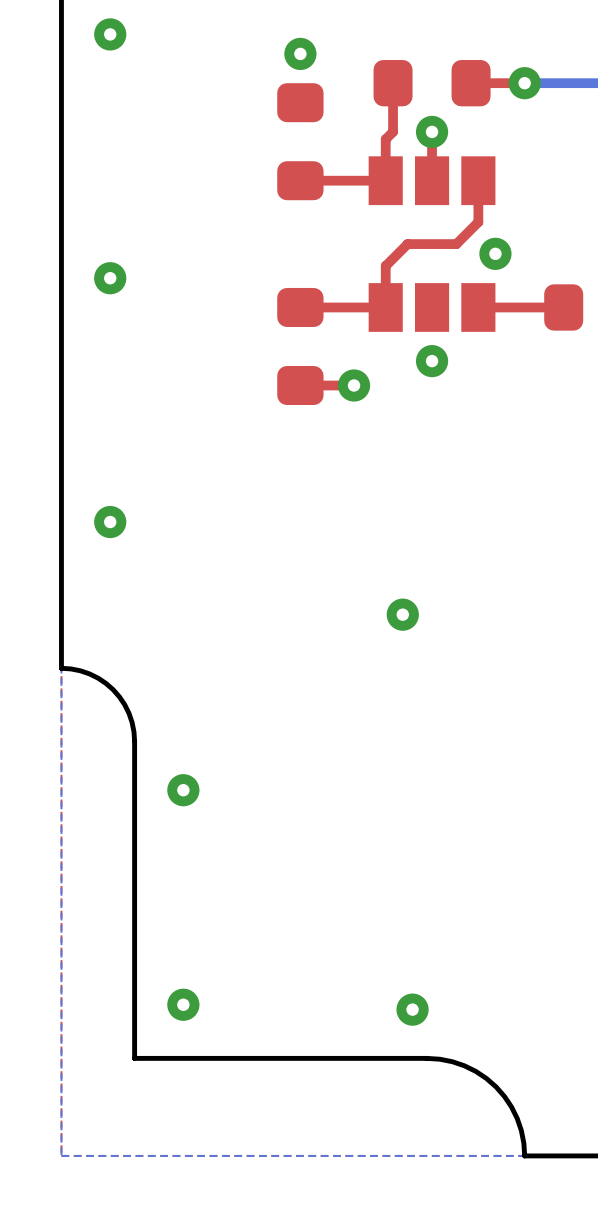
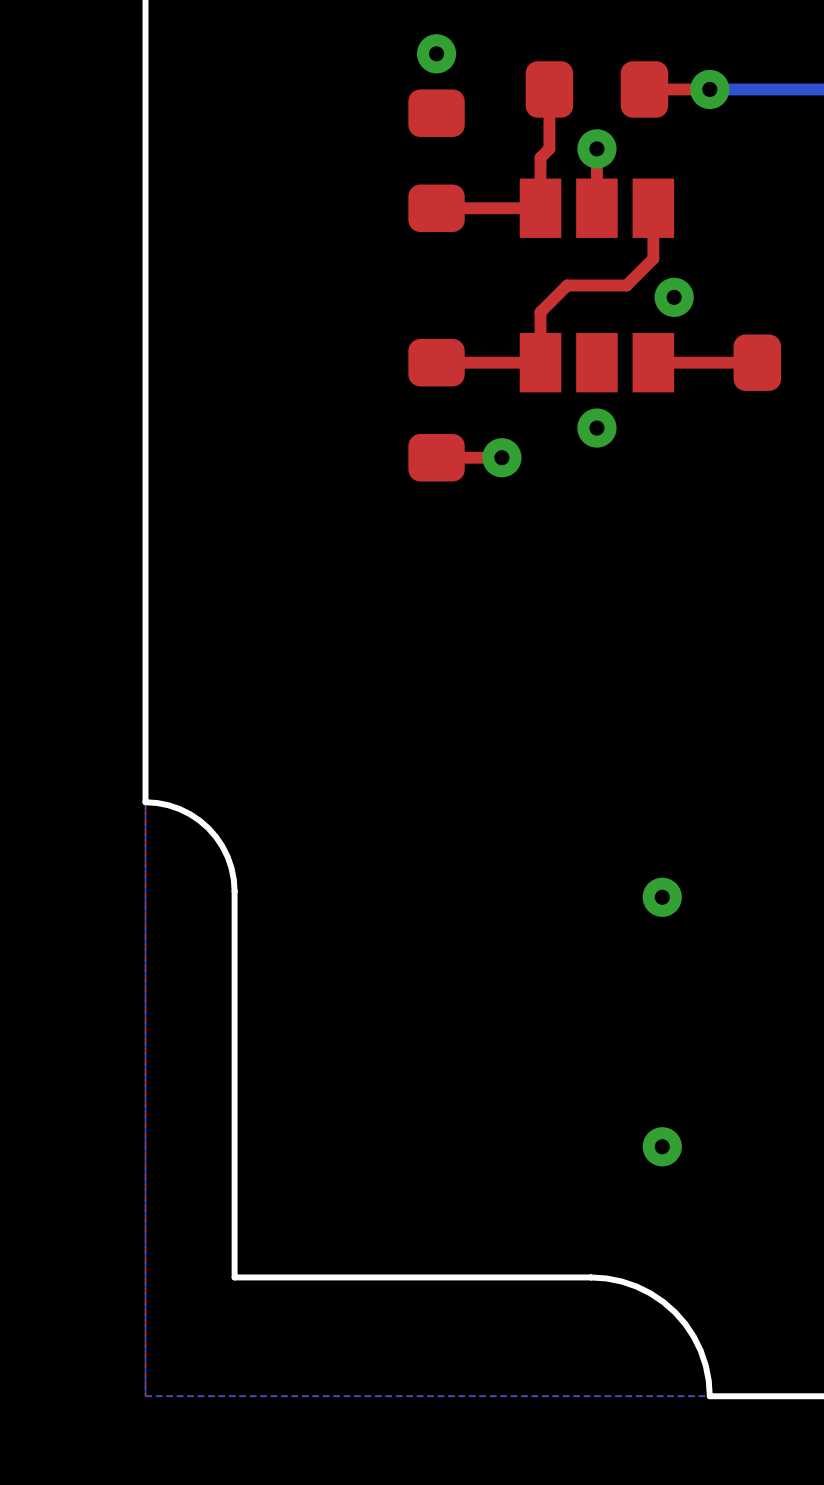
via: (110, 34) -> none
via: (110, 278) -> none
via: (110, 522) -> none
via: (402, 614) -> none
via: none -> (662, 897)
via: (183, 790) -> none
via: (183, 1004) -> none
via position: (412, 1009) -> (662, 1146)

